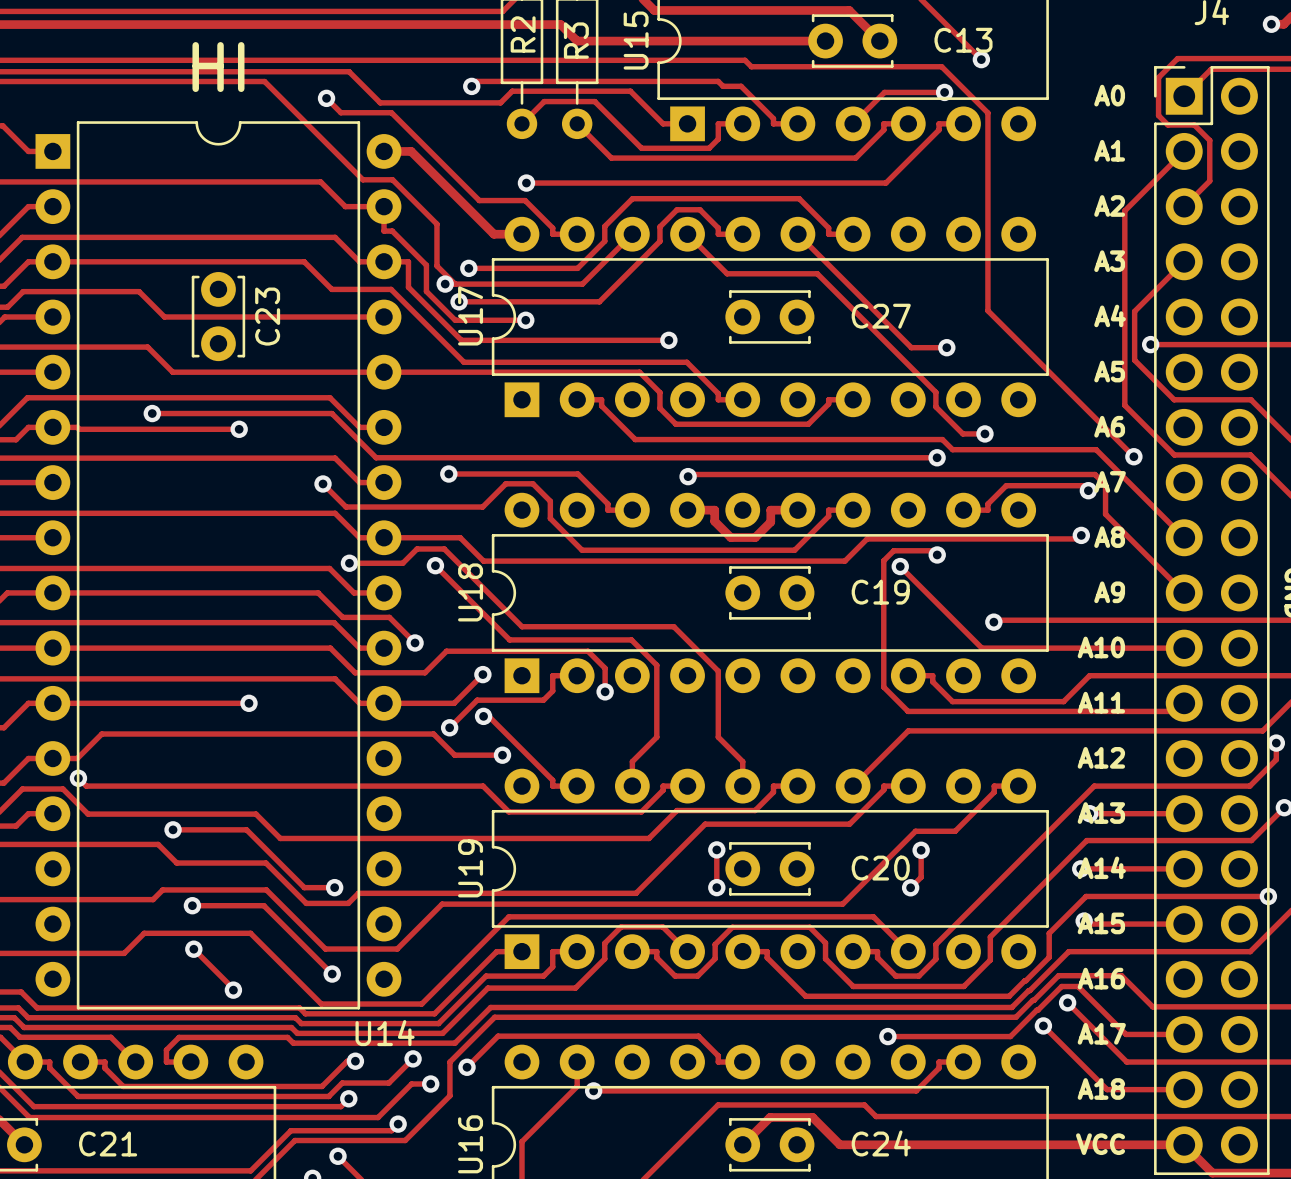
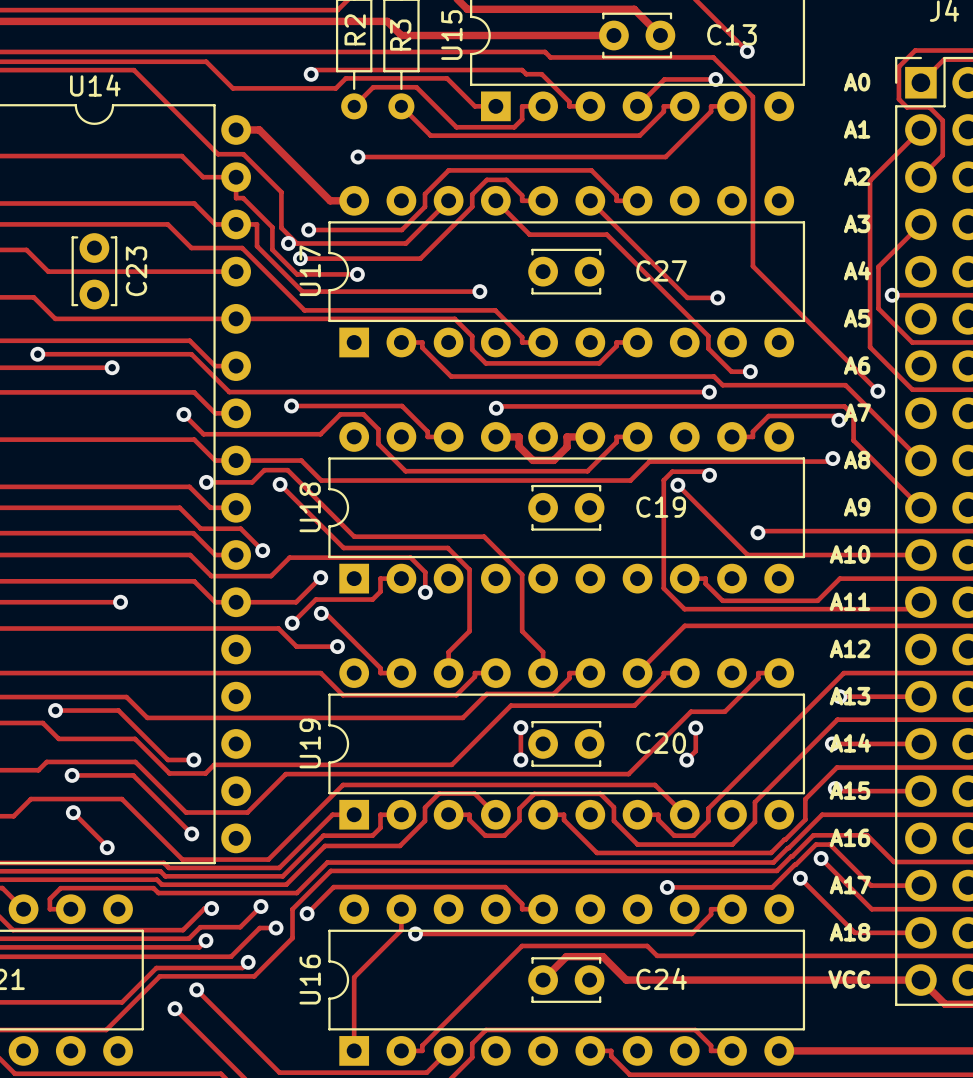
text: HI (218, 67) -> none
track: (326, 98) (340, 112) (391, 112) (479, 200) (525, 200) (552, 228) (552, 234) (577, 234) -> none
via: (326, 98) -> none
U14 name position: U14 (385, 1033) -> U14 (95, 85)

